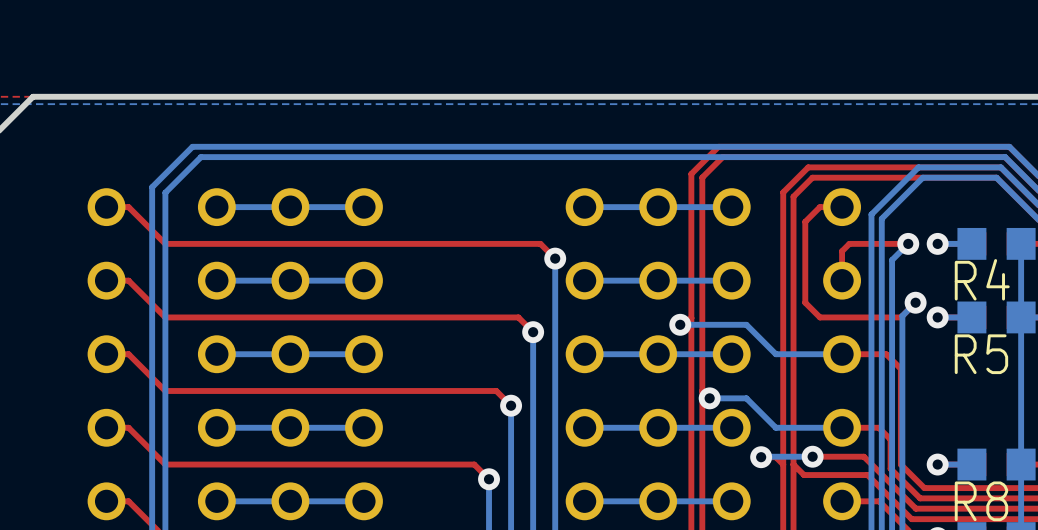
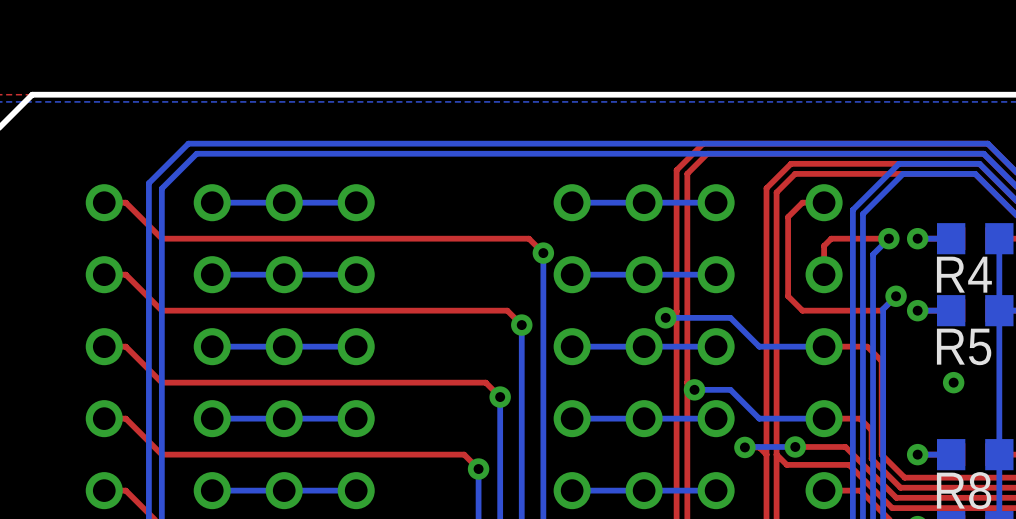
via: none -> (953, 382)

